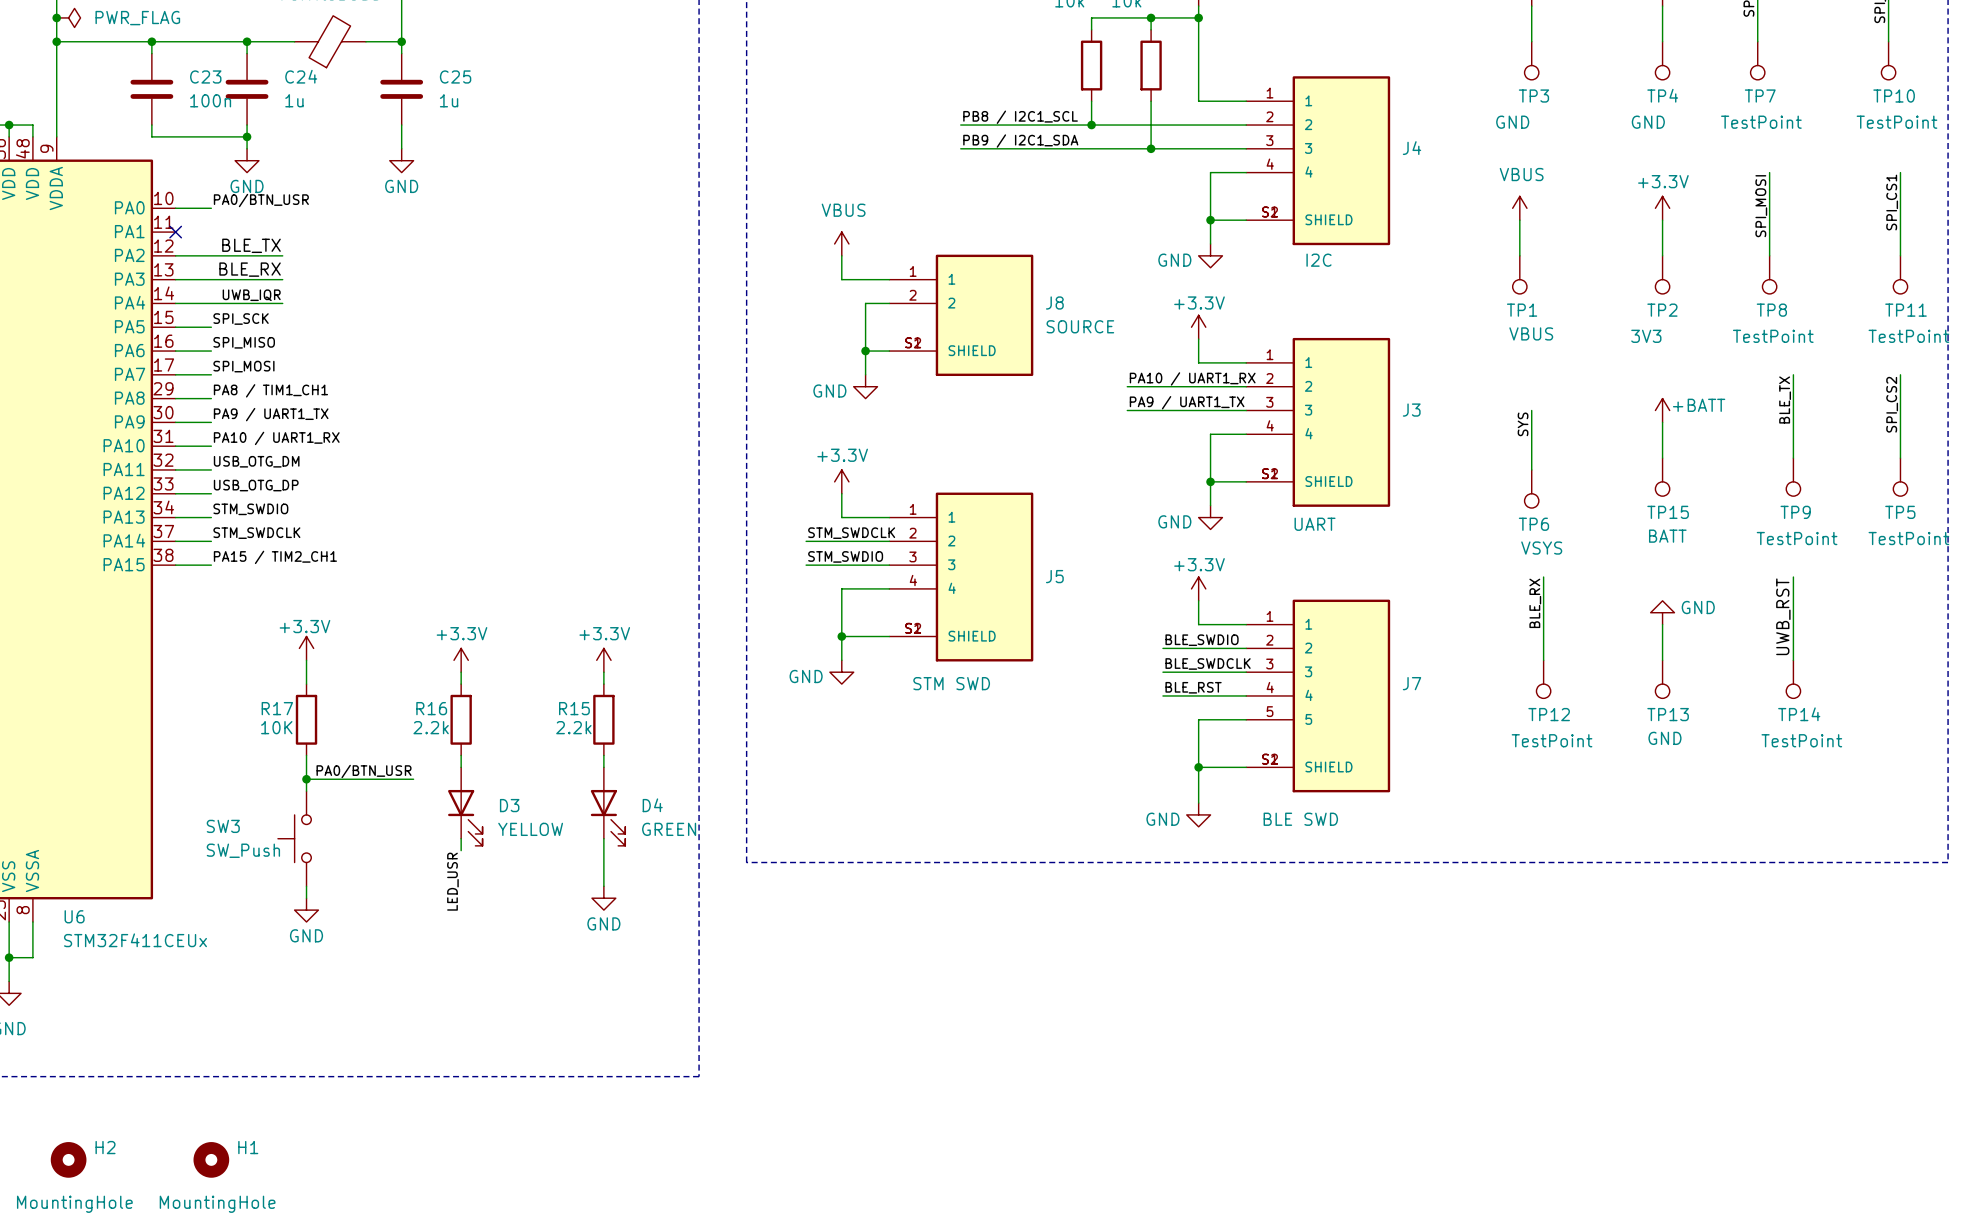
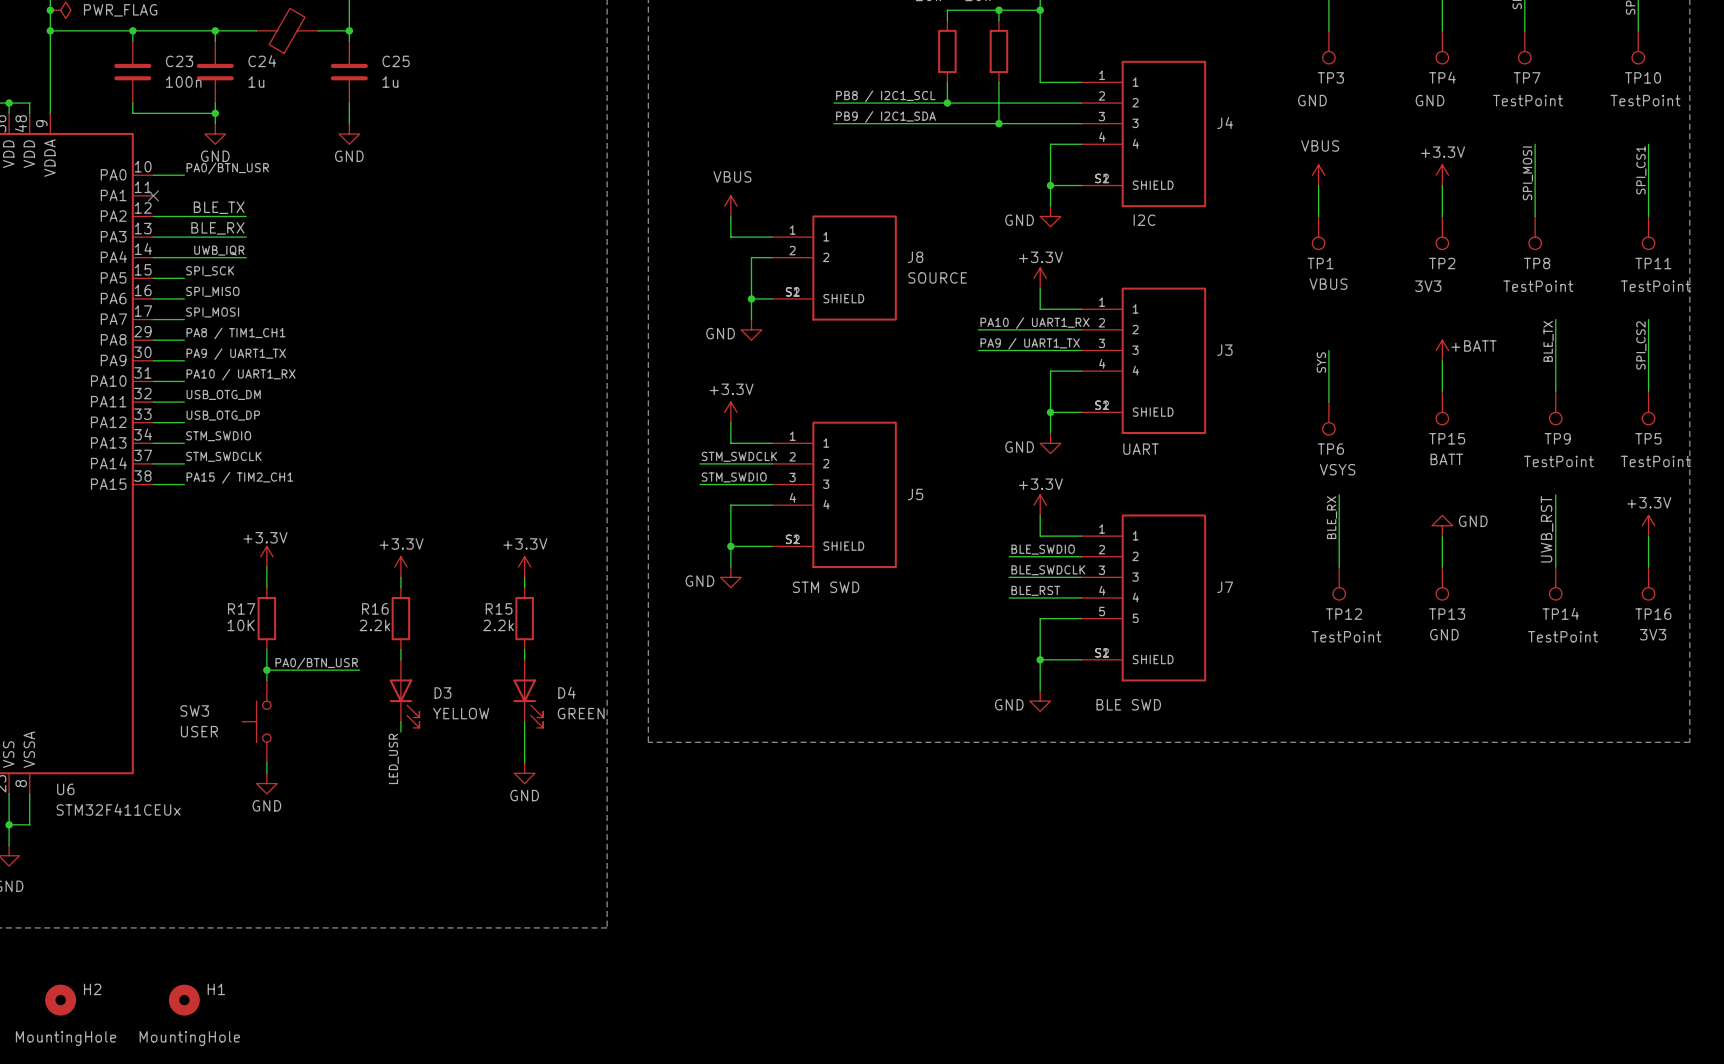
power symbol: none -> +3.3V (1648, 525)
wire: none -> (1648, 536) (1648, 567)
TP16: none -> 3V3 (1648, 583)
SW3 value: SW_Push (243, 850) -> USER (199, 731)

